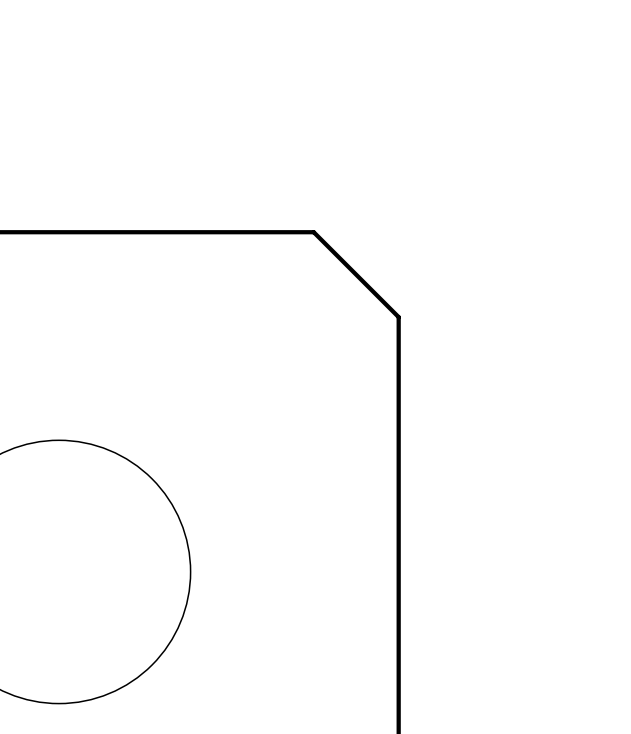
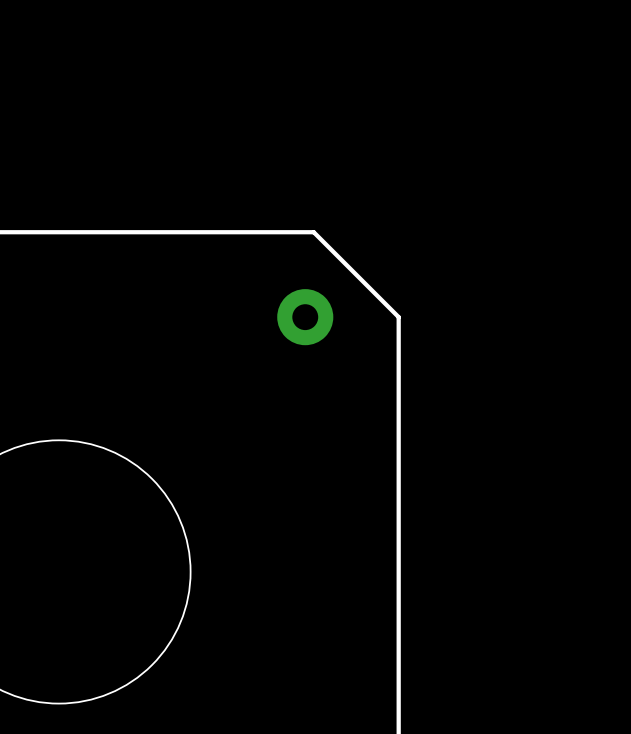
via: none -> (305, 317)

